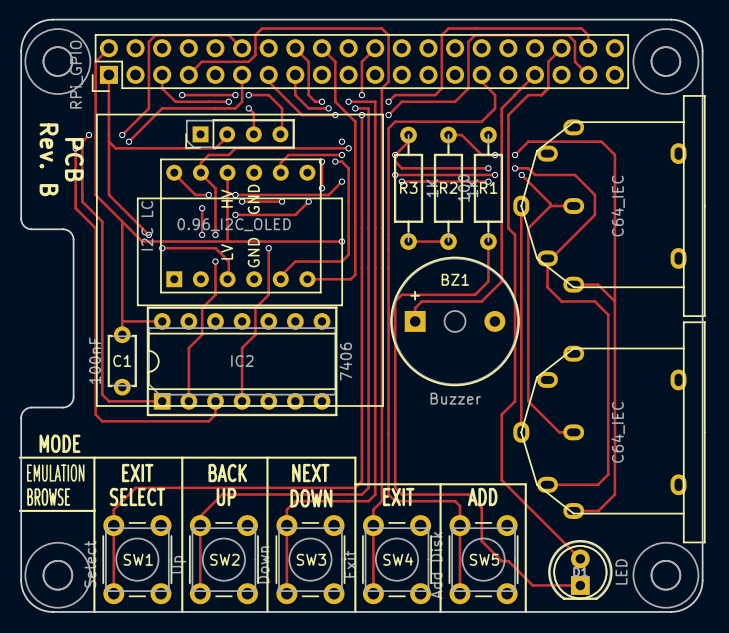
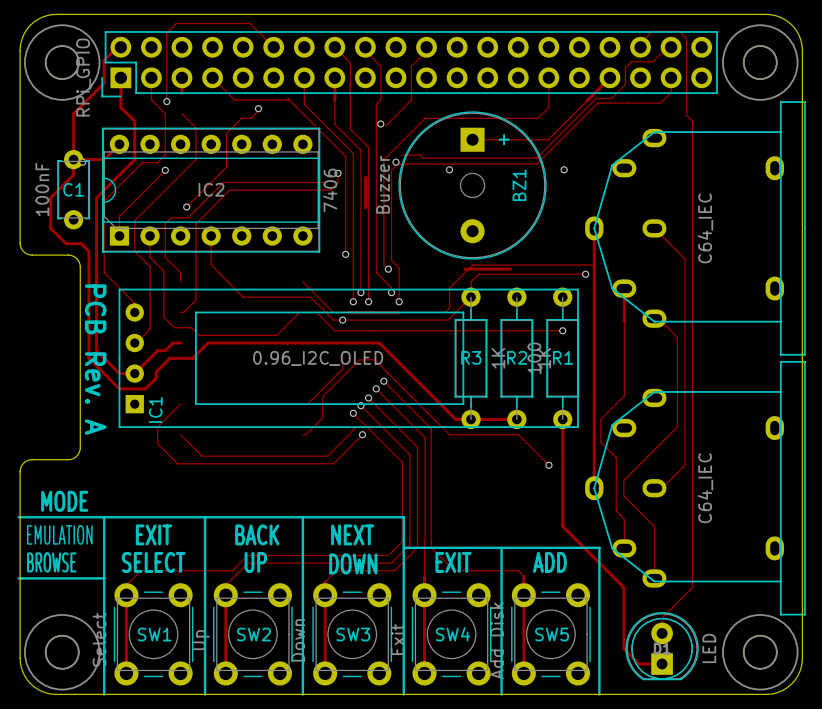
track: (108, 48) (95, 61) (95, 194) (142, 241) (341, 241) -> (120, 47) (117, 47) (104, 60) (104, 83) (73, 113) (73, 174) (50, 197) (50, 228) (65, 243) (81, 243) (88, 251) (88, 358) (119, 388) (145, 388) (156, 378) (156, 372) (169, 358) (192, 358) (208, 343) (379, 343) (455, 419) (516, 419)
track: (241, 48) (228, 35) (155, 35) (148, 41) (148, 108) (122, 135) -> (273, 47) (250, 23) (176, 23) (166, 32) (166, 101)
track: (295, 48) (308, 61) (308, 95) (315, 101) (322, 101) -> (334, 47) (350, 62) (350, 129) (368, 147) (368, 301)
track: (321, 48) (335, 61) (335, 101) (355, 121) (355, 274) (350, 279) -> (365, 47) (365, 50) (380, 66) (380, 100) (376, 104) (376, 272) (391, 288) (391, 292)
track: (375, 48) (361, 61) (361, 95) -> (426, 47) (426, 51) (411, 66) (411, 100) (385, 125)
track: (561, 48) (548, 61) (548, 88) (541, 95) (528, 95) (508, 115) (508, 228) (515, 234) (515, 401) (501, 414) (501, 480) (580, 558) -> (640, 47) (640, 43) (652, 31) (678, 31) (686, 38) (686, 115) (692, 121) (692, 587) (662, 618) (662, 633)
track: (588, 48) (588, 35) (581, 28) (448, 28) (441, 35) (441, 88) (435, 95) (395, 95) (388, 101) -> (671, 47) (667, 47) (652, 61) (631, 61) (625, 67) (625, 84) (611, 98) (596, 98) (536, 158) (423, 158) (420, 155) (400, 155)
track: none -> (151, 77) (151, 99) (165, 113) (165, 155) (157, 162) (142, 162) (104, 200) (104, 272) (134, 303) (134, 312)
track: (188, 74) (201, 61) (248, 61) (255, 55) (255, 35) (262, 28) (381, 28) (388, 35) (388, 81) (381, 88) (381, 501) (373, 509) -> (376, 388) (425, 437) (424, 576)
track: none -> (212, 77) (234, 100) (289, 100)
track: (242, 74) (242, 101) (235, 108) (162, 108) (128, 141) -> none
track: (588, 74) (574, 61) (574, 41) (568, 35) (475, 35) (468, 41) (468, 88) (455, 101) (401, 101) (388, 115) -> (671, 77) (671, 92) (660, 103) (597, 103) (536, 164) (397, 164) (391, 170) (391, 260) (399, 268) (399, 301)
track: (268, 81) (302, 115) (335, 115) -> (304, 85) (304, 99)
track: (481, 81) (495, 95) (495, 108) (481, 121) (395, 121) (388, 128) (388, 494) (395, 501) (455, 501) (459, 506) (459, 509) -> (383, 381) (431, 428) (431, 547) (454, 570) (518, 570) (523, 576)
track: none -> (548, 85) (548, 107) (538, 118) (425, 118) (383, 159) (383, 266)
track: (162, 88) (175, 101) (228, 101) -> none
track: none -> (287, 98) (345, 156) (345, 254)
track: none -> (304, 99) (304, 104) (353, 153) (353, 301)
track: (514, 94) (501, 108) (501, 281) (481, 301) (421, 301) (415, 308) (415, 321) -> (586, 101) (548, 139) (472, 139)
via: none -> (166, 101)
track: (182, 95) (235, 95) -> none
via: (182, 95) -> none
via: (235, 95) -> none
track: (248, 95) (268, 95) (282, 108) (282, 132) (280, 134) -> none
via: (248, 95) -> none
track: (295, 95) (308, 108) (328, 108) -> (334, 101) (334, 124) (360, 150) (360, 292)
via: (361, 95) -> none
track: (108, 100) (108, 134) -> (120, 107) (134, 121) (134, 159) (96, 197) (96, 350) (119, 373) (134, 373) (157, 350) (165, 350) (172, 343) (180, 343)
track: none -> (261, 107) (250, 118) (241, 118) (226, 133) (226, 167) (186, 206)
via: (322, 101) -> none
track: (348, 101) (375, 101) (375, 494) (368, 501) (295, 501) (286, 509) (286, 514) -> (368, 398) (417, 446) (417, 547) (394, 570) (336, 570) (325, 582)
via: (348, 101) -> none
via: (388, 101) -> none
track: none -> (181, 113) (195, 127) (195, 159) (134, 220) (134, 251) (150, 266) (150, 329) (134, 343)
track: (248, 108) (253, 113) (253, 134) -> none
via: (248, 108) -> none
via: (328, 108) -> none
track: (355, 108) (368, 108) (368, 487) (361, 494) (222, 494) (200, 516) -> (360, 405) (409, 454) (409, 544) (391, 563) (247, 563) (225, 585)
via: (355, 108) -> none
track: (361, 115) (361, 481) (355, 487) (135, 487) (113, 509) (113, 516) -> (353, 413) (402, 462) (402, 541) (388, 555) (247, 555) (232, 570) (140, 570) (126, 585)
via: (361, 115) -> none
via: (388, 115) -> none
track: none -> (119, 144) (104, 159) (73, 159)
track: (227, 134) (215, 148) (115, 148) (108, 141) -> none
track: (89, 135) (82, 141) (82, 201) (102, 221) (102, 394) (108, 401) (162, 401) -> none
via: (89, 135) -> none
track: (108, 135) (108, 194) (148, 234) -> none
via: (122, 135) -> none
track: (408, 135) (408, 141) (395, 155) (395, 161) (401, 168) (488, 168) -> none
track: (448, 135) (461, 135) (481, 155) (495, 155) -> none
via: (128, 141) -> none
via: (341, 141) -> none
track: (75, 148) (75, 208) (95, 228) (95, 414) (102, 421) (208, 421) (215, 414) (215, 401) -> none
track: (348, 148) (235, 148) (228, 155) (208, 155) (200, 162) (200, 173) (215, 188) (215, 234) -> none
track: none -> (165, 170) (119, 216) (119, 236)
via: none -> (165, 170)
track: (341, 155) (288, 155) (280, 162) (280, 172) -> none
via: (341, 155) -> none
track: (515, 155) (528, 141) (601, 141) (614, 155) (614, 494) (598, 510) (573, 510) -> (658, 318) (677, 337) (677, 427) (623, 480) (623, 495) (654, 526) (654, 578)
via: (515, 155) -> none
track: none -> (338, 173) (338, 182) (330, 190) (229, 190) (195, 223) (195, 300) (183, 312) (180, 312)
via: none -> (338, 173)
text: Rev. B (49, 159) -> none
text: PCB (74, 159) -> none
via: (322, 161) -> none
track: (335, 161) (341, 161) (348, 168) (348, 254) (341, 261) (295, 261) (280, 276) (280, 279) -> none
via: (335, 161) -> none
track: none -> (325, 182) (223, 182) (188, 217) (171, 217) (165, 223) (165, 257) (180, 272) (180, 281)
via: (488, 168) -> none
track: (515, 168) (528, 168) (535, 174) (574, 174) (594, 194) (594, 214) (551, 258) (547, 258) -> none
via: (515, 168) -> none
track: (174, 172) (195, 194) (208, 194) -> none
track: (227, 172) (227, 241) -> none
track: (395, 174) (495, 174) -> none
via: (395, 174) -> none
via: (495, 174) -> none
track: (521, 174) (550, 206) -> none
via: (521, 174) -> none
track: (341, 181) (328, 194) (235, 194) -> none
via: (341, 181) -> none
track: (401, 181) (488, 181) -> none
via: (401, 181) -> none
via: (488, 181) -> none
via: none -> (186, 206)
via: (322, 188) -> none
R3 position: (408, 188) -> (471, 358)
R2 position: (448, 188) -> (516, 358)
R1 position: (488, 188) -> (562, 358)
via: (208, 194) -> none
via: (235, 194) -> none
track: (242, 201) (282, 201) -> none
via: (242, 201) -> none
via: (282, 201) -> none
track: (308, 201) (295, 214) (235, 214) -> none
via: (308, 201) -> none
track: (550, 206) (528, 228) (528, 401) (559, 432) (573, 432) -> (654, 228) (685, 258) (685, 465) (662, 488) (654, 488)
track: (550, 206) (573, 206) -> none
track: (202, 208) (202, 234) -> none
via: (202, 208) -> none
track: none -> (150, 236) (150, 257) (163, 271) (163, 317) (174, 327) (191, 327) (198, 335) (276, 335) (299, 312) (316, 312) (334, 330) (562, 330)
track: none -> (211, 236) (211, 265) (243, 297) (310, 297) (333, 320) (448, 320) (471, 297) (471, 281) (478, 274) (585, 274)
via: (235, 214) -> none
track: (122, 221) (122, 334) -> none
part: I2C LC (240, 225) -> none
via: none -> (345, 254)
via: (148, 234) -> none
via: (202, 234) -> none
via: (215, 234) -> none
track: none -> (594, 265) (472, 265) (449, 288) (449, 307) (445, 312) (398, 312)
track: (488, 241) (488, 281) (475, 294) (401, 294) (395, 301) (395, 487) (401, 494) (468, 494) (481, 507) (481, 541) (501, 561) (508, 561) (532, 585) (560, 585) -> (562, 419) (562, 526) (623, 587) (623, 648) (639, 664)
via: none -> (585, 274)
track: (162, 248) (215, 248) (228, 261) (227, 279) -> none
via: (162, 248) -> none
track: (268, 248) (268, 294) (255, 308) (255, 334) (242, 348) (242, 401) -> none
via: (268, 248) -> none
track: none -> (302, 281) (333, 312) (348, 312)
part: 0.96_I2C_OLED (239, 260) -> none
track: (215, 261) (215, 294) (202, 308) (202, 334) (188, 348) (188, 401) -> none
via: (215, 261) -> none
via: none -> (360, 292)
via: none -> (391, 292)
via: none -> (353, 301)
via: none -> (368, 301)
via: none -> (399, 301)
track: (577, 284) (598, 284) (614, 301) -> none
via: none -> (342, 320)
track: (547, 287) (561, 301) (594, 301) (608, 314) (608, 474) (598, 484) (547, 484) -> (624, 321) (624, 396) (600, 419) (600, 442) (616, 457) (616, 511) (624, 519) (624, 548)
via: none -> (562, 330)
track: none -> (342, 353) (342, 369) (307, 404) (302, 404)
IC1: none -> 0.96_I2C_OLED (348, 358)
text: none -> PCB Rev. A (95, 359)
track: (122, 321) (162, 321) -> none
BZ1 rotation: 0° (455, 321) -> 90° clockwise (472, 185)
BZ1 position: (455, 321) -> (472, 185)
via: none -> (383, 381)
via: none -> (376, 388)
via: none -> (368, 398)
track: none -> (180, 404) (157, 427) (157, 443) (177, 463) (333, 463) (362, 434)
C1 position: (122, 360) -> (73, 189)
via: none -> (360, 405)
IC2 position: (242, 361) -> (211, 190)
via: none -> (353, 413)
track: none -> (356, 427) (327, 456) (202, 456) (180, 434)
track: none -> (302, 434) (305, 434) (322, 417) (322, 396) (359, 359) (374, 359) (449, 434) (518, 434) (548, 465)
via: none -> (362, 434)
via: none -> (548, 465)

